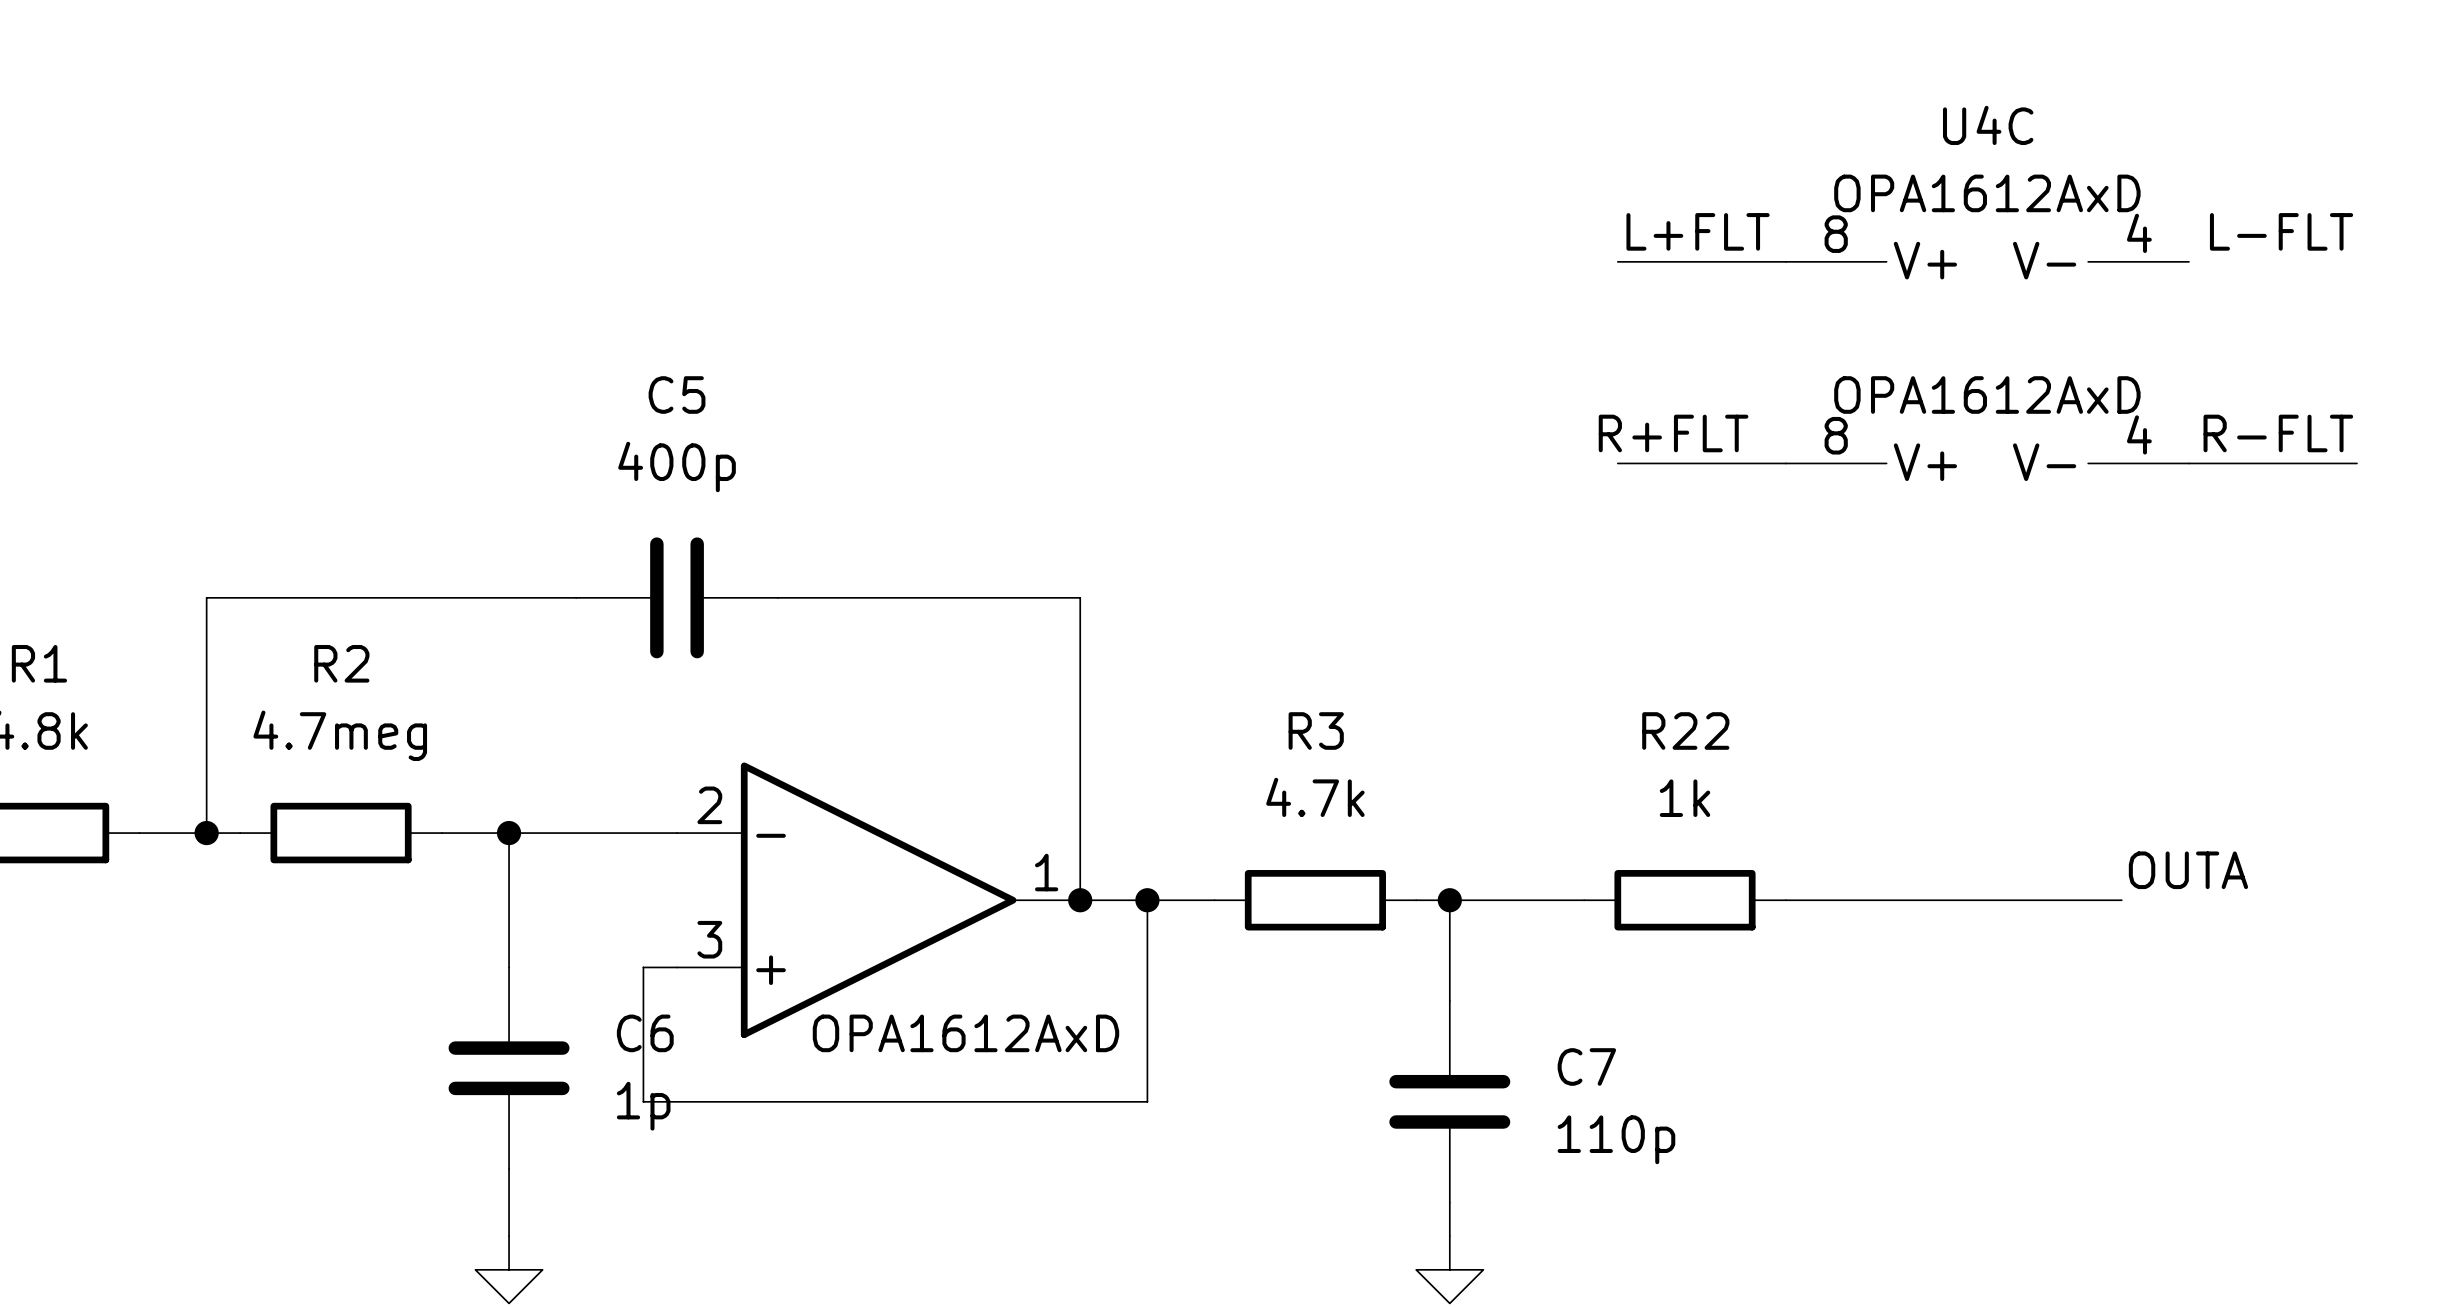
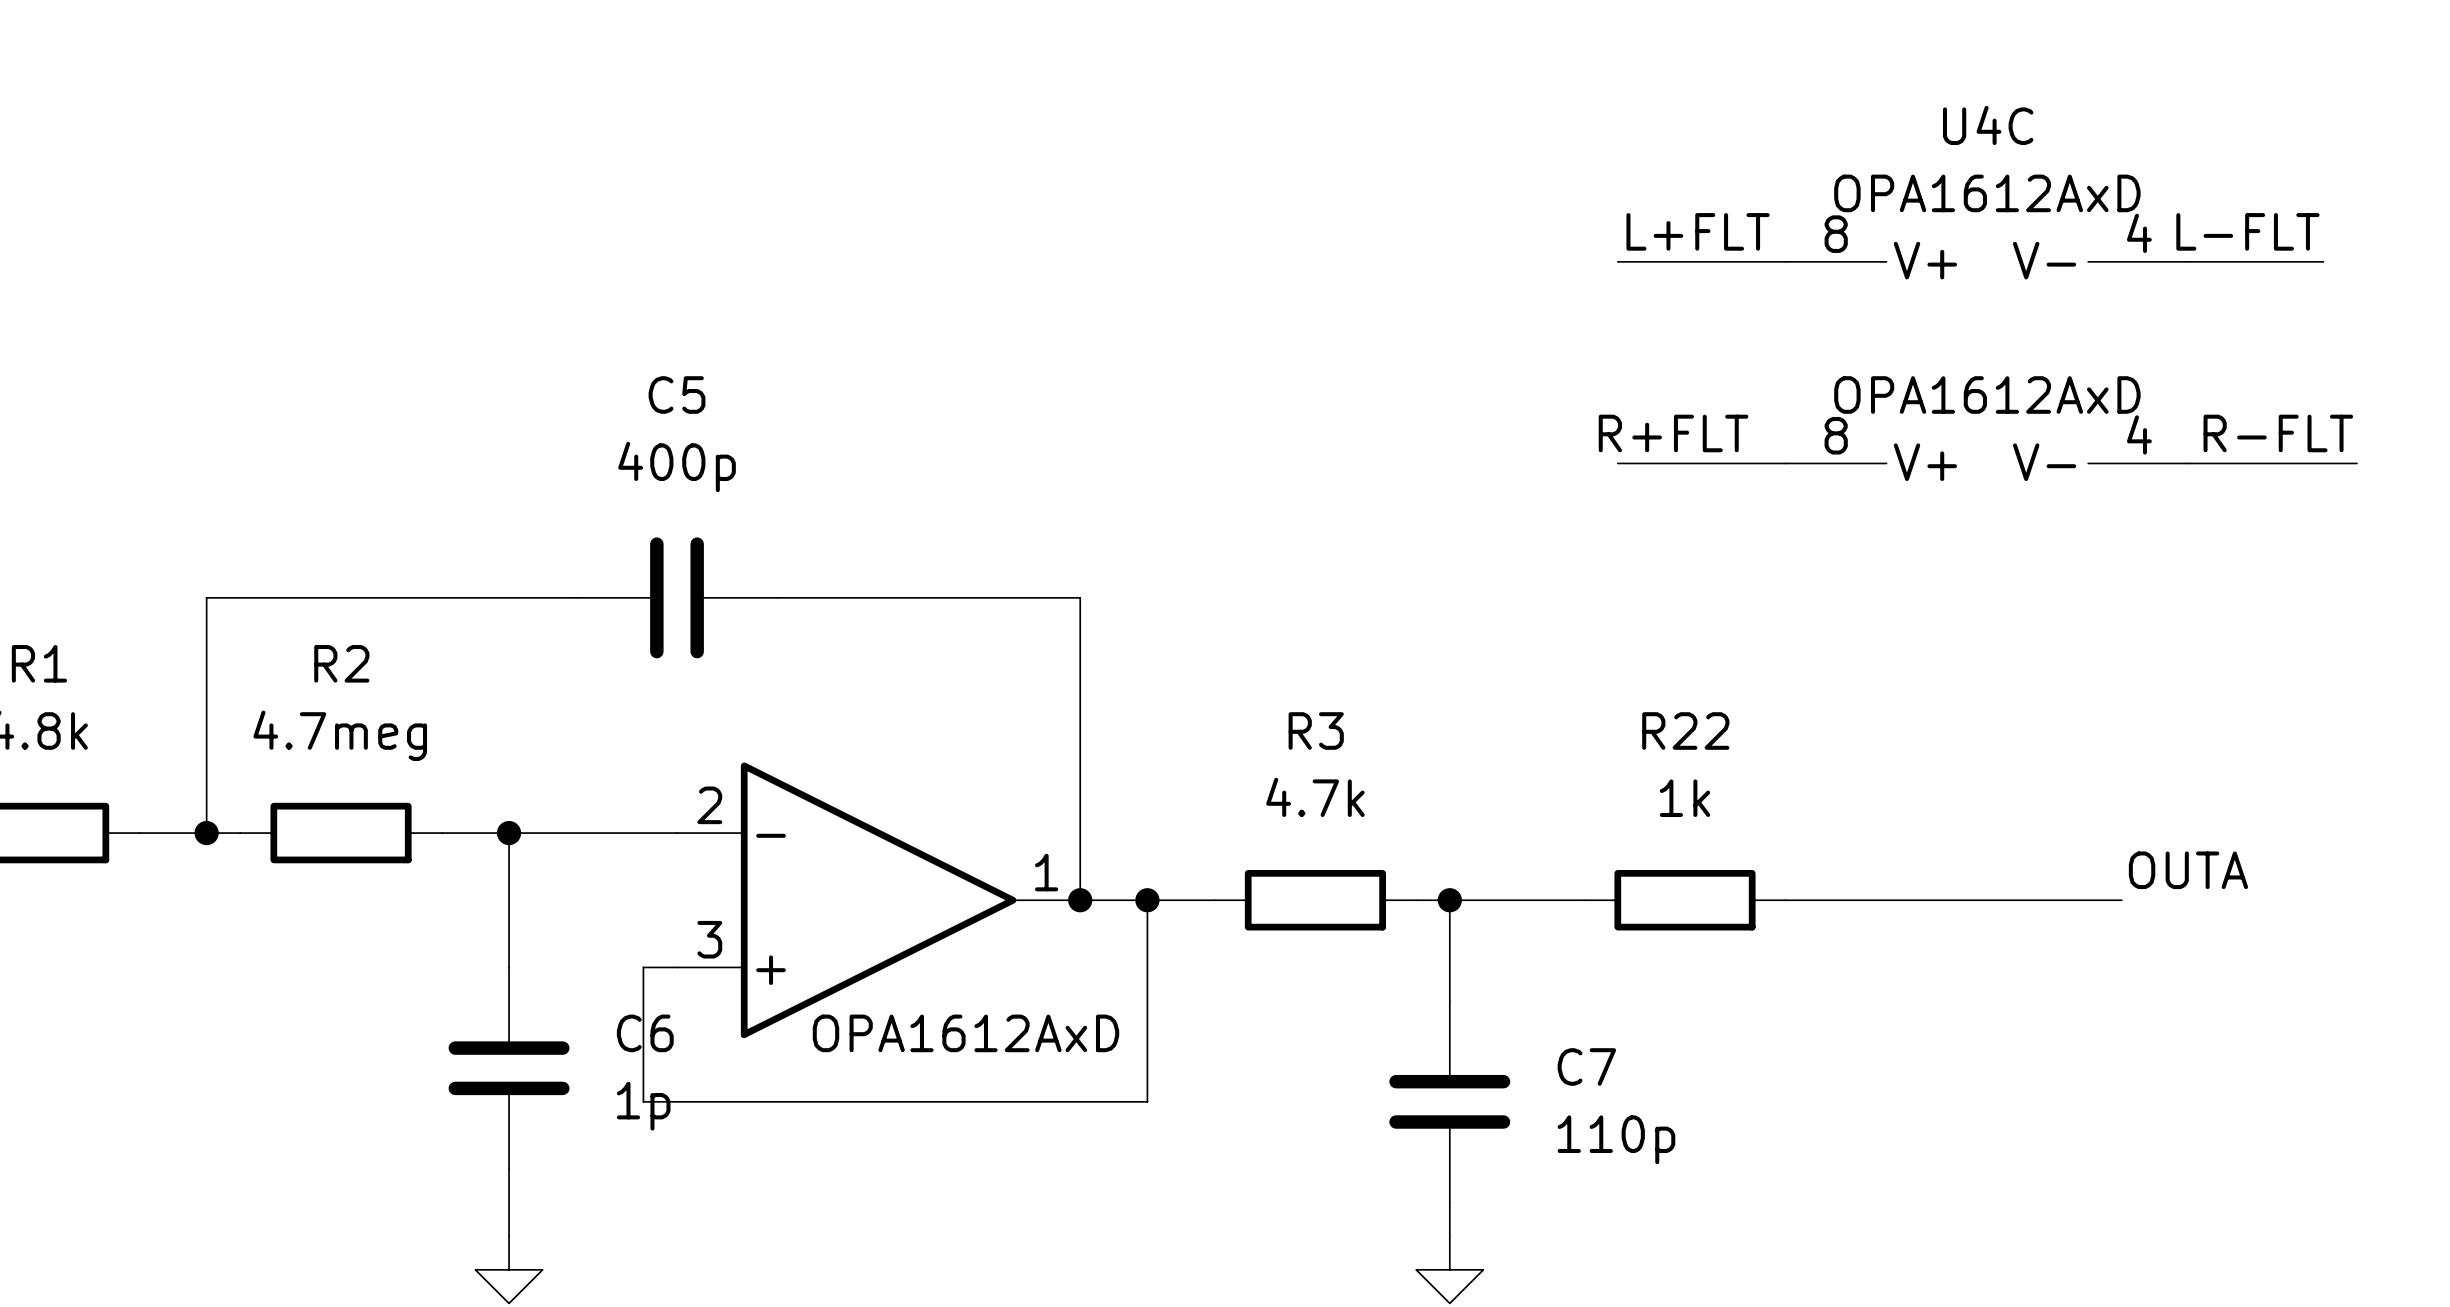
label position: L-FLT (2281, 231) -> L-FLT (2247, 231)
wire: none -> (2188, 261) (2323, 261)

